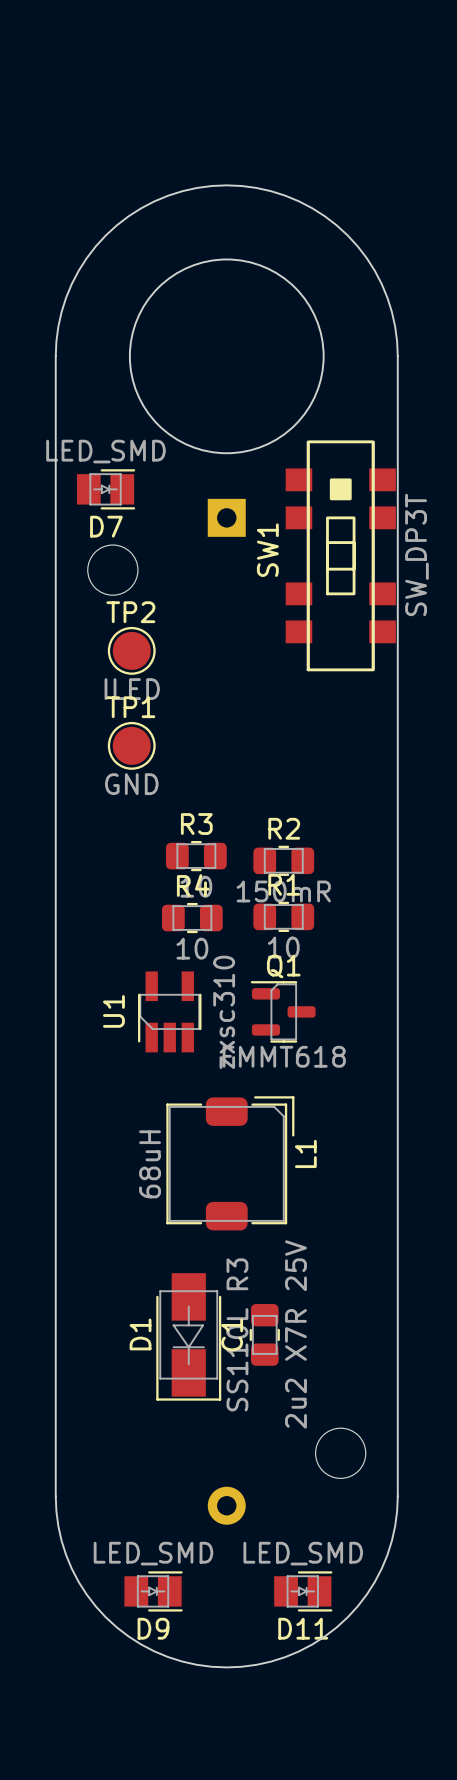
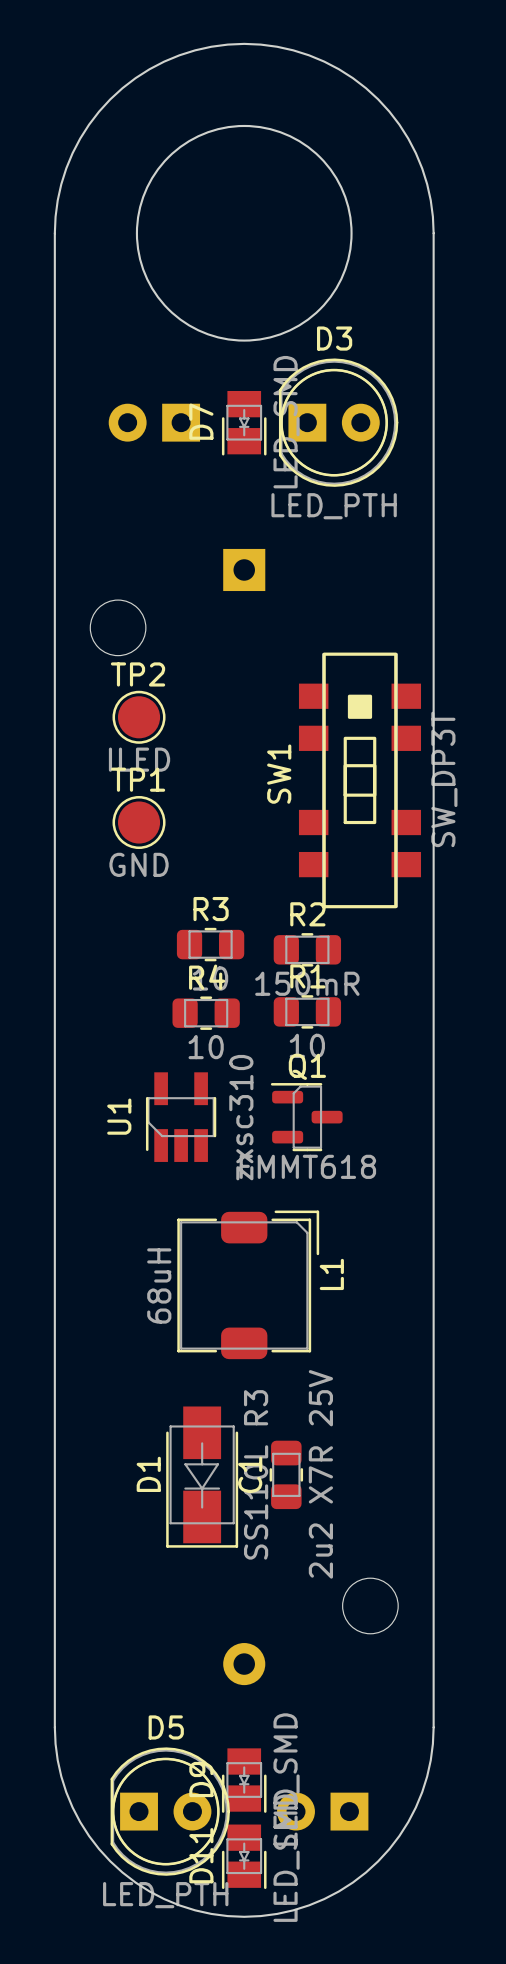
board edge: (55, 356) (58, 326) (71, 284) (86, 258) (105, 235) (128, 216) (154, 201) (197, 187) (226, 185) (256, 187) (299, 201) (324, 216) (347, 235) (366, 258) (381, 284) (395, 326) (397, 356) -> (54, 391) (55, 216) (61, 184) (80, 138) (110, 99) (149, 69) (195, 50) (244, 43) (293, 50) (338, 69) (378, 99) (408, 138) (427, 184) (432, 216) (433, 391)
round board edge position: (226, 356) -> (244, 233)
part: none -> (154, 422)
D3: none -> LED_PTH (338, 422)
D7 rotation: 0° (106, 489) -> 90° clockwise (244, 423)
D7 position: (106, 489) -> (244, 423)
SW1 position: (340, 555) -> (359, 780)
board edge: (55, 1496) (58, 1526) (71, 1568) (86, 1594) (105, 1617) (128, 1636) (154, 1651) (197, 1664) (226, 1667) (256, 1664) (299, 1651) (324, 1636) (347, 1617) (366, 1594) (381, 1568) (395, 1526) (397, 1496) -> (54, 1653) (54, 1727) (57, 1760) (72, 1807) (89, 1836) (122, 1872) (149, 1891) (195, 1910) (244, 1916) (293, 1910) (338, 1891) (365, 1872) (399, 1836) (415, 1807) (430, 1760) (433, 1727) (433, 1653)
D9 rotation: 0° (153, 1591) -> 90° clockwise (244, 1780)
D9 position: (153, 1591) -> (244, 1780)
D11 rotation: 0° (303, 1591) -> 90° clockwise (244, 1856)
D11 position: (303, 1591) -> (244, 1856)
D5: none -> LED_PTH (170, 1811)
part: none -> (322, 1811)

